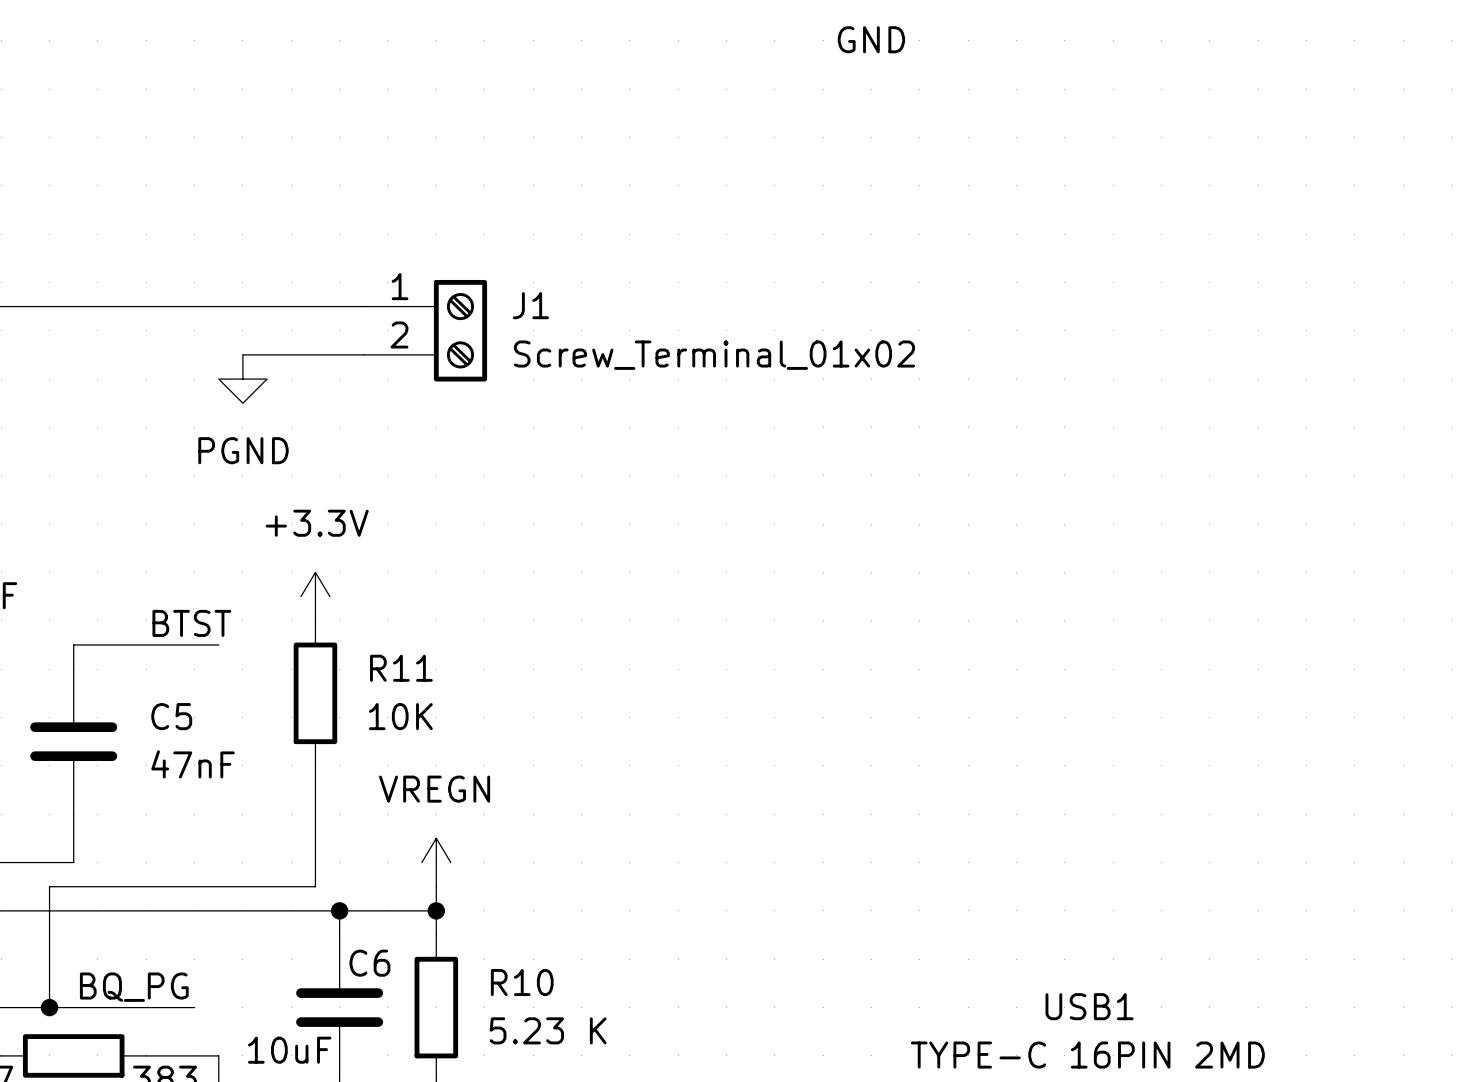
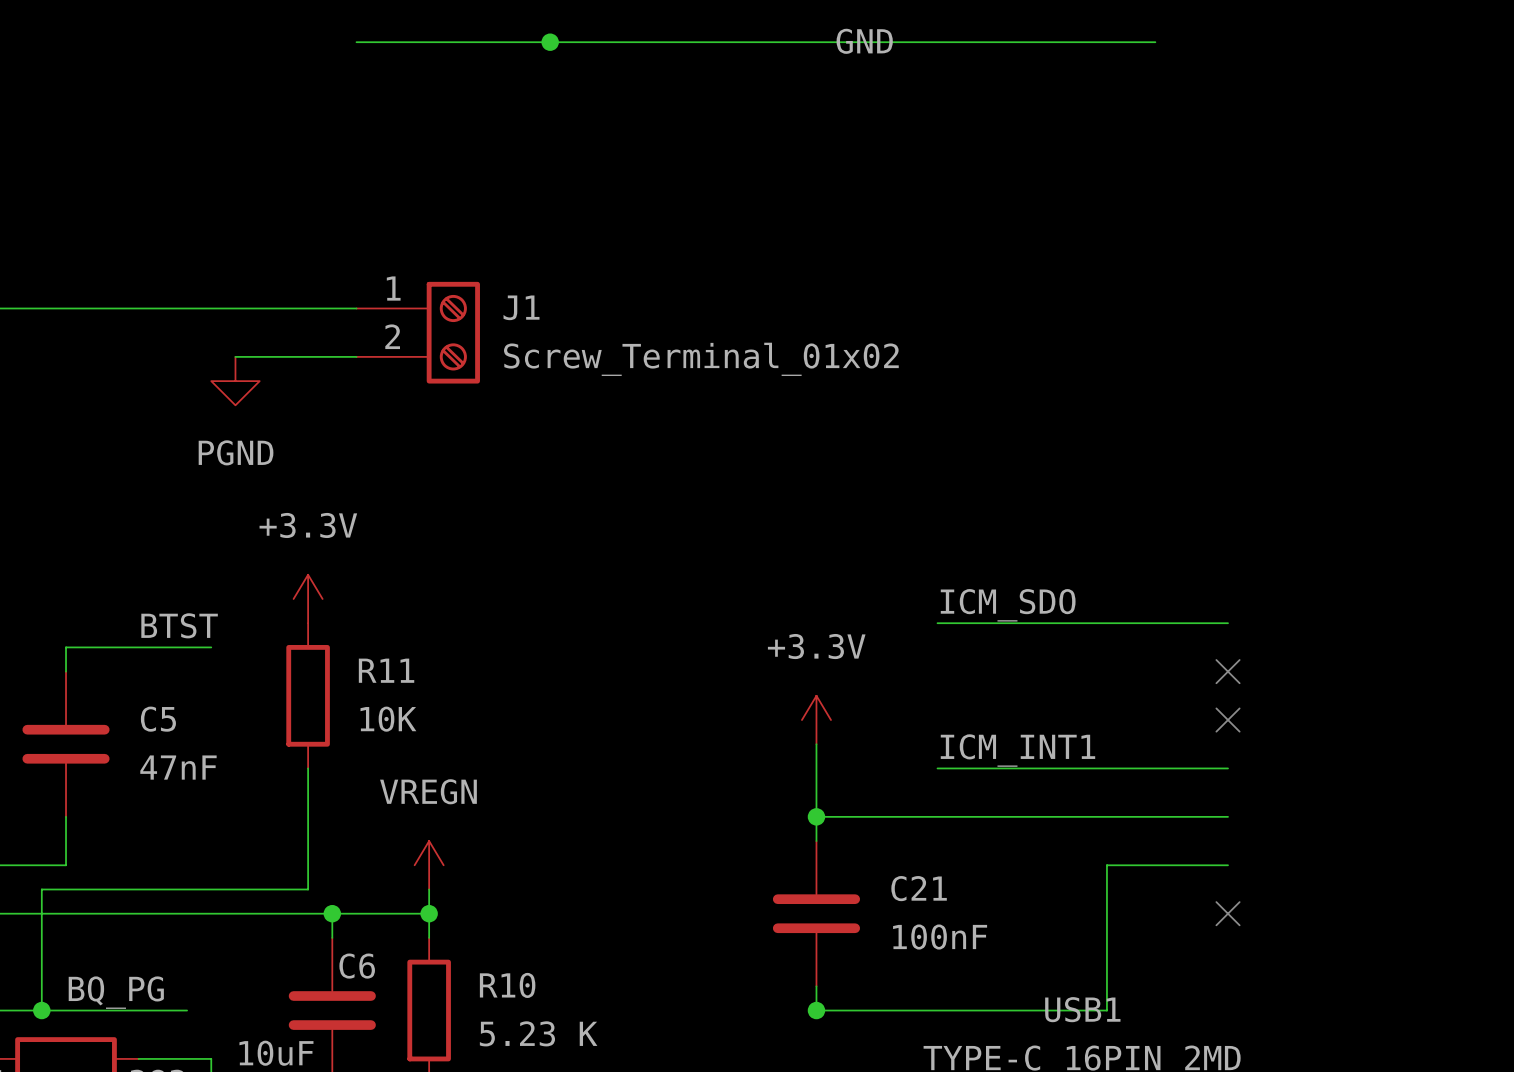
wire: none -> (356, 42) (1155, 42)
junction: none -> (550, 42)
label: none -> ICM_SDO (1008, 605)
wire: none -> (937, 623) (1228, 623)
no-connect mark: none -> (1228, 671)
power symbol: none -> +3.3V (816, 720)
no-connect mark: none -> (1228, 720)
wire: none -> (816, 744) (816, 841)
label: none -> ICM_INT1 (1017, 750)
wire: none -> (937, 768) (1228, 768)
wire: none -> (816, 816) (1228, 816)
junction: none -> (816, 816)
wire: none -> (1228, 865) (1106, 865) (1106, 1010) (816, 1010) (816, 986)
C21: none -> 100nF (816, 913)
no-connect mark: none -> (1228, 913)
junction: none -> (816, 1010)

